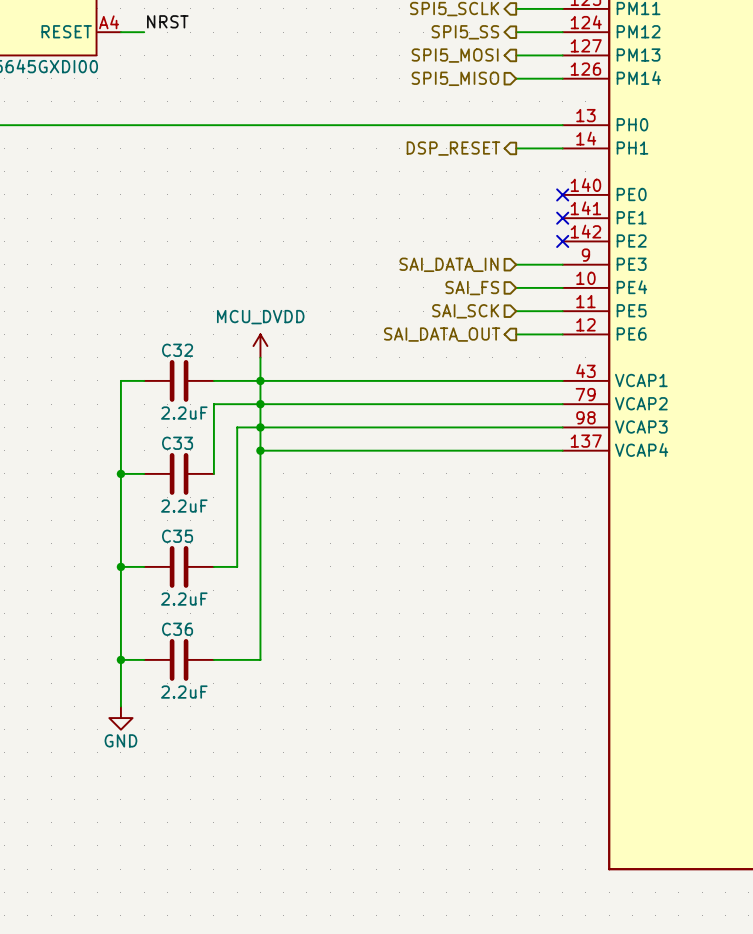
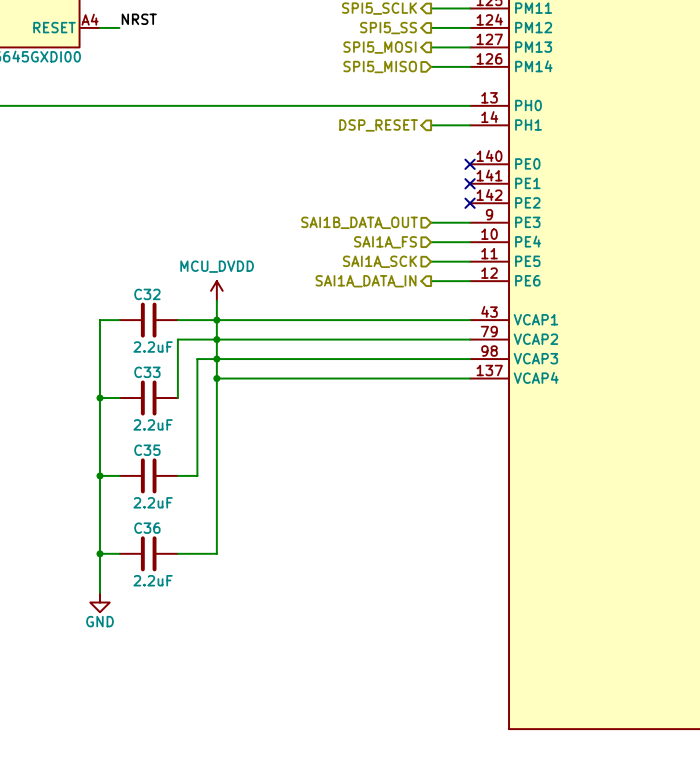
hierarchical label: SAI_DATA_IN (449, 264) -> SAI1B_DATA_OUT (359, 222)
hierarchical label: SAI_FS (472, 288) -> SAI1A_FS (385, 242)
hierarchical label: SAI_SCK (465, 311) -> SAI1A_SCK (379, 261)
hierarchical label: SAI_DATA_OUT (442, 334) -> SAI1A_DATA_IN (366, 281)

